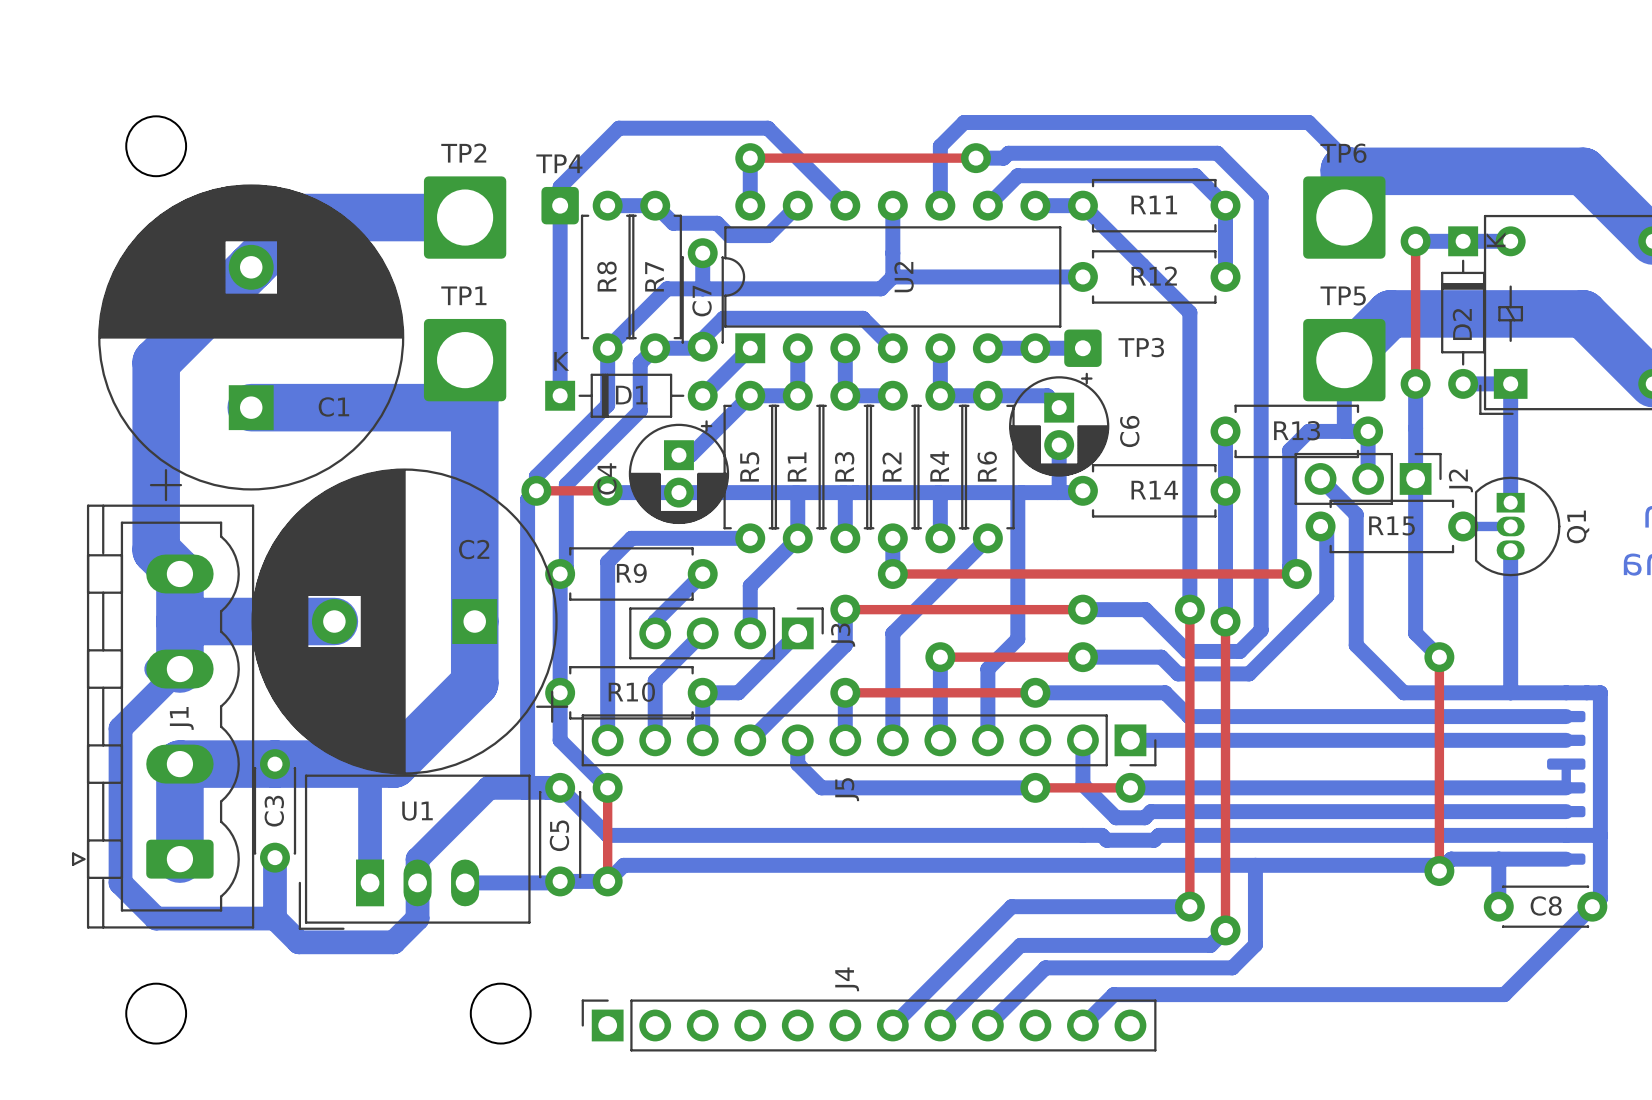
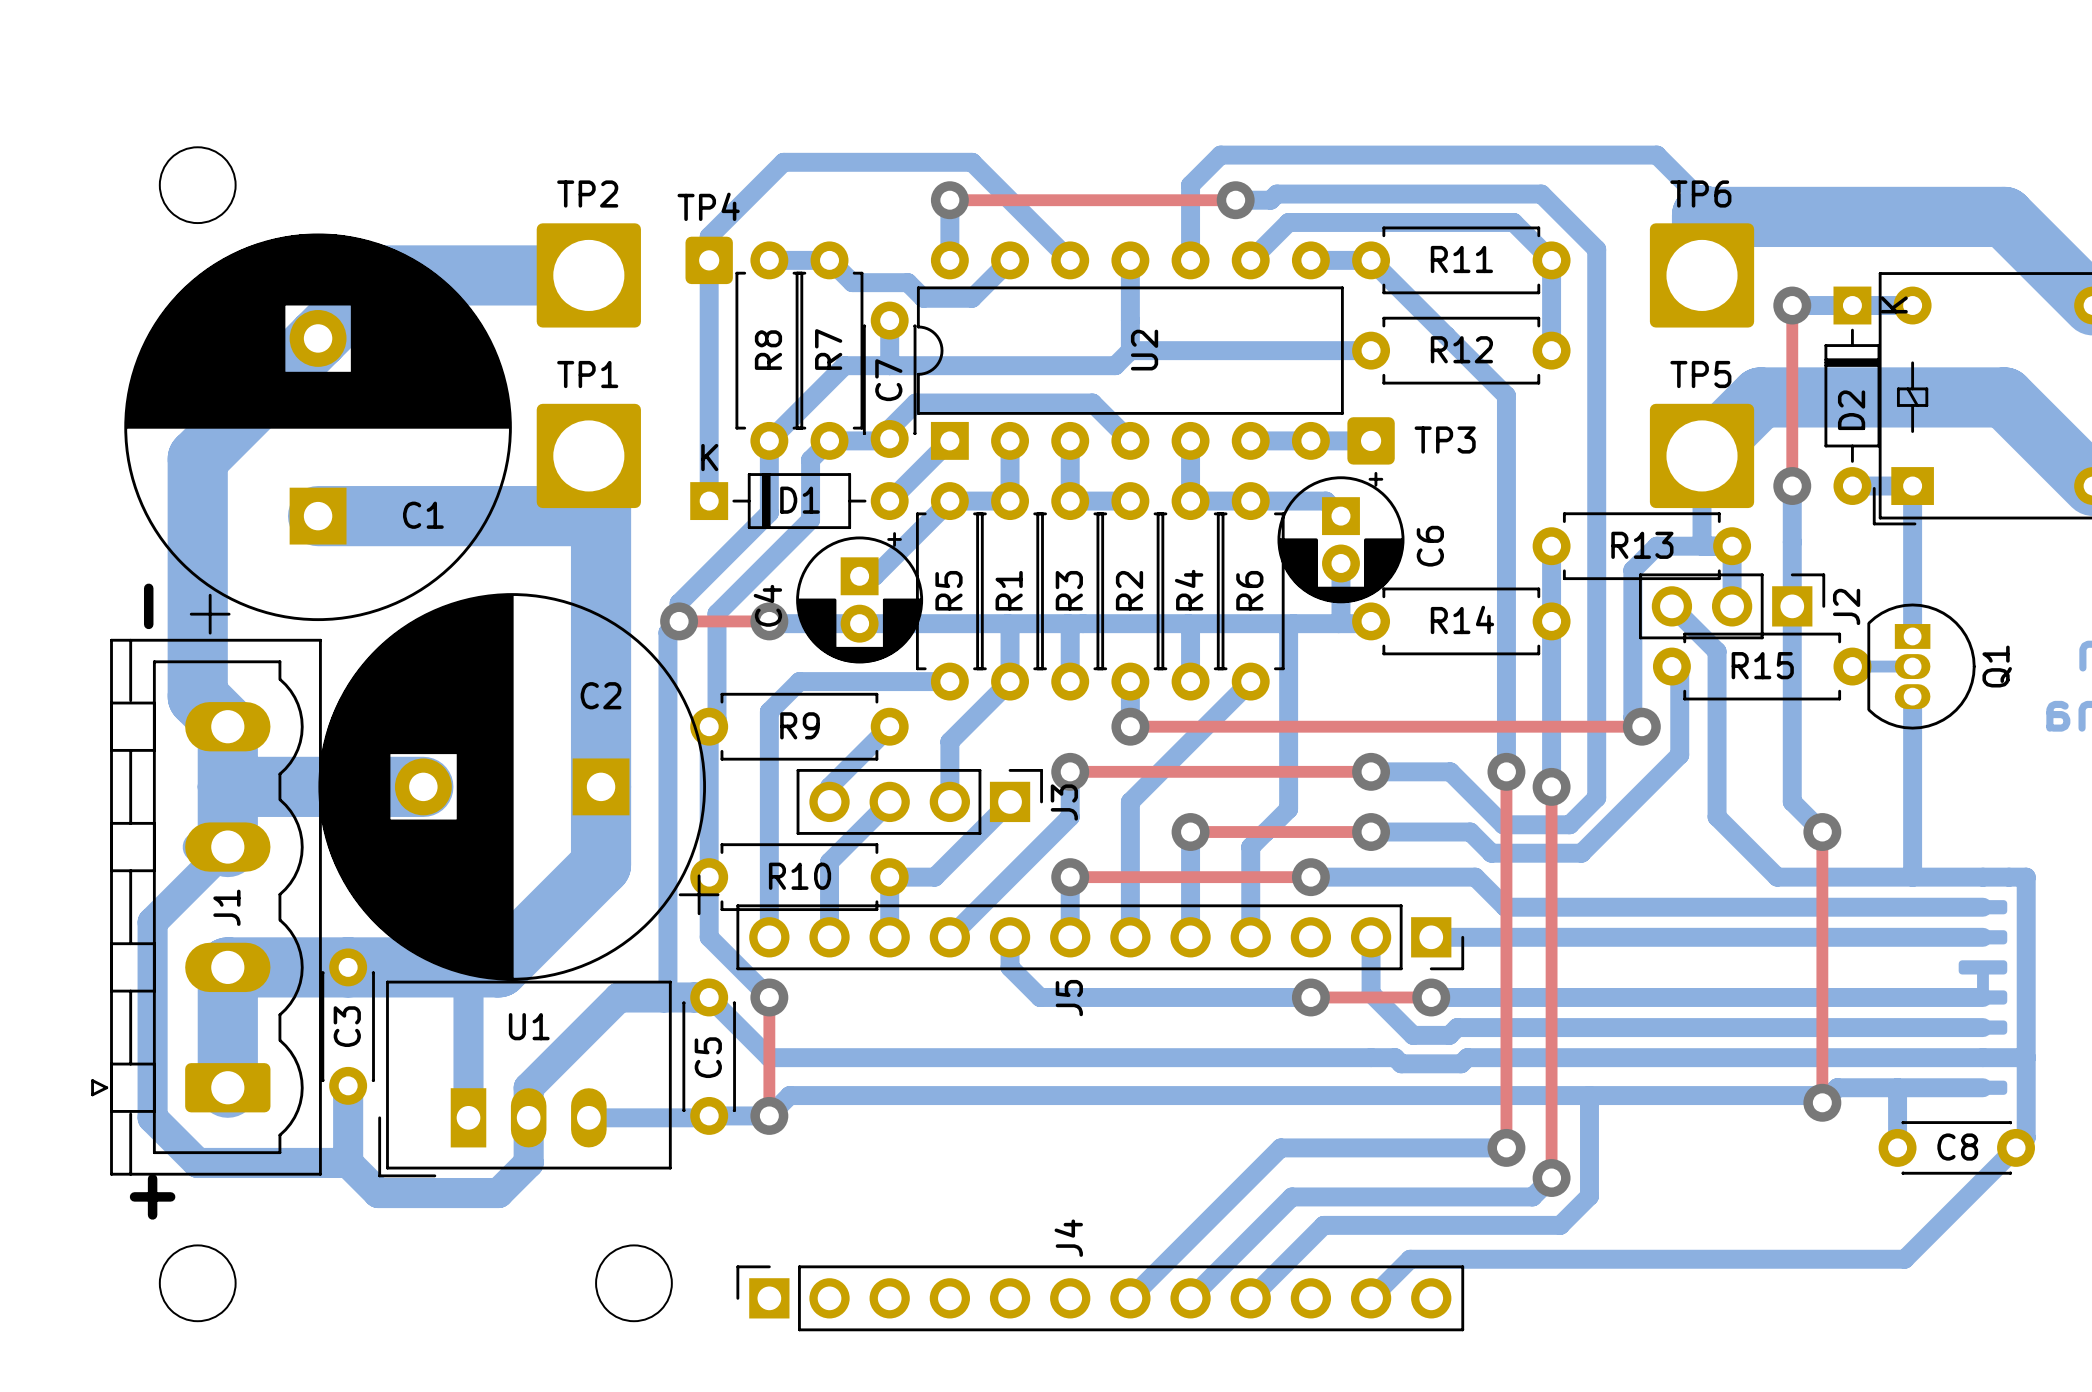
text: none -> - (148, 606)
text: none -> + (152, 1196)

